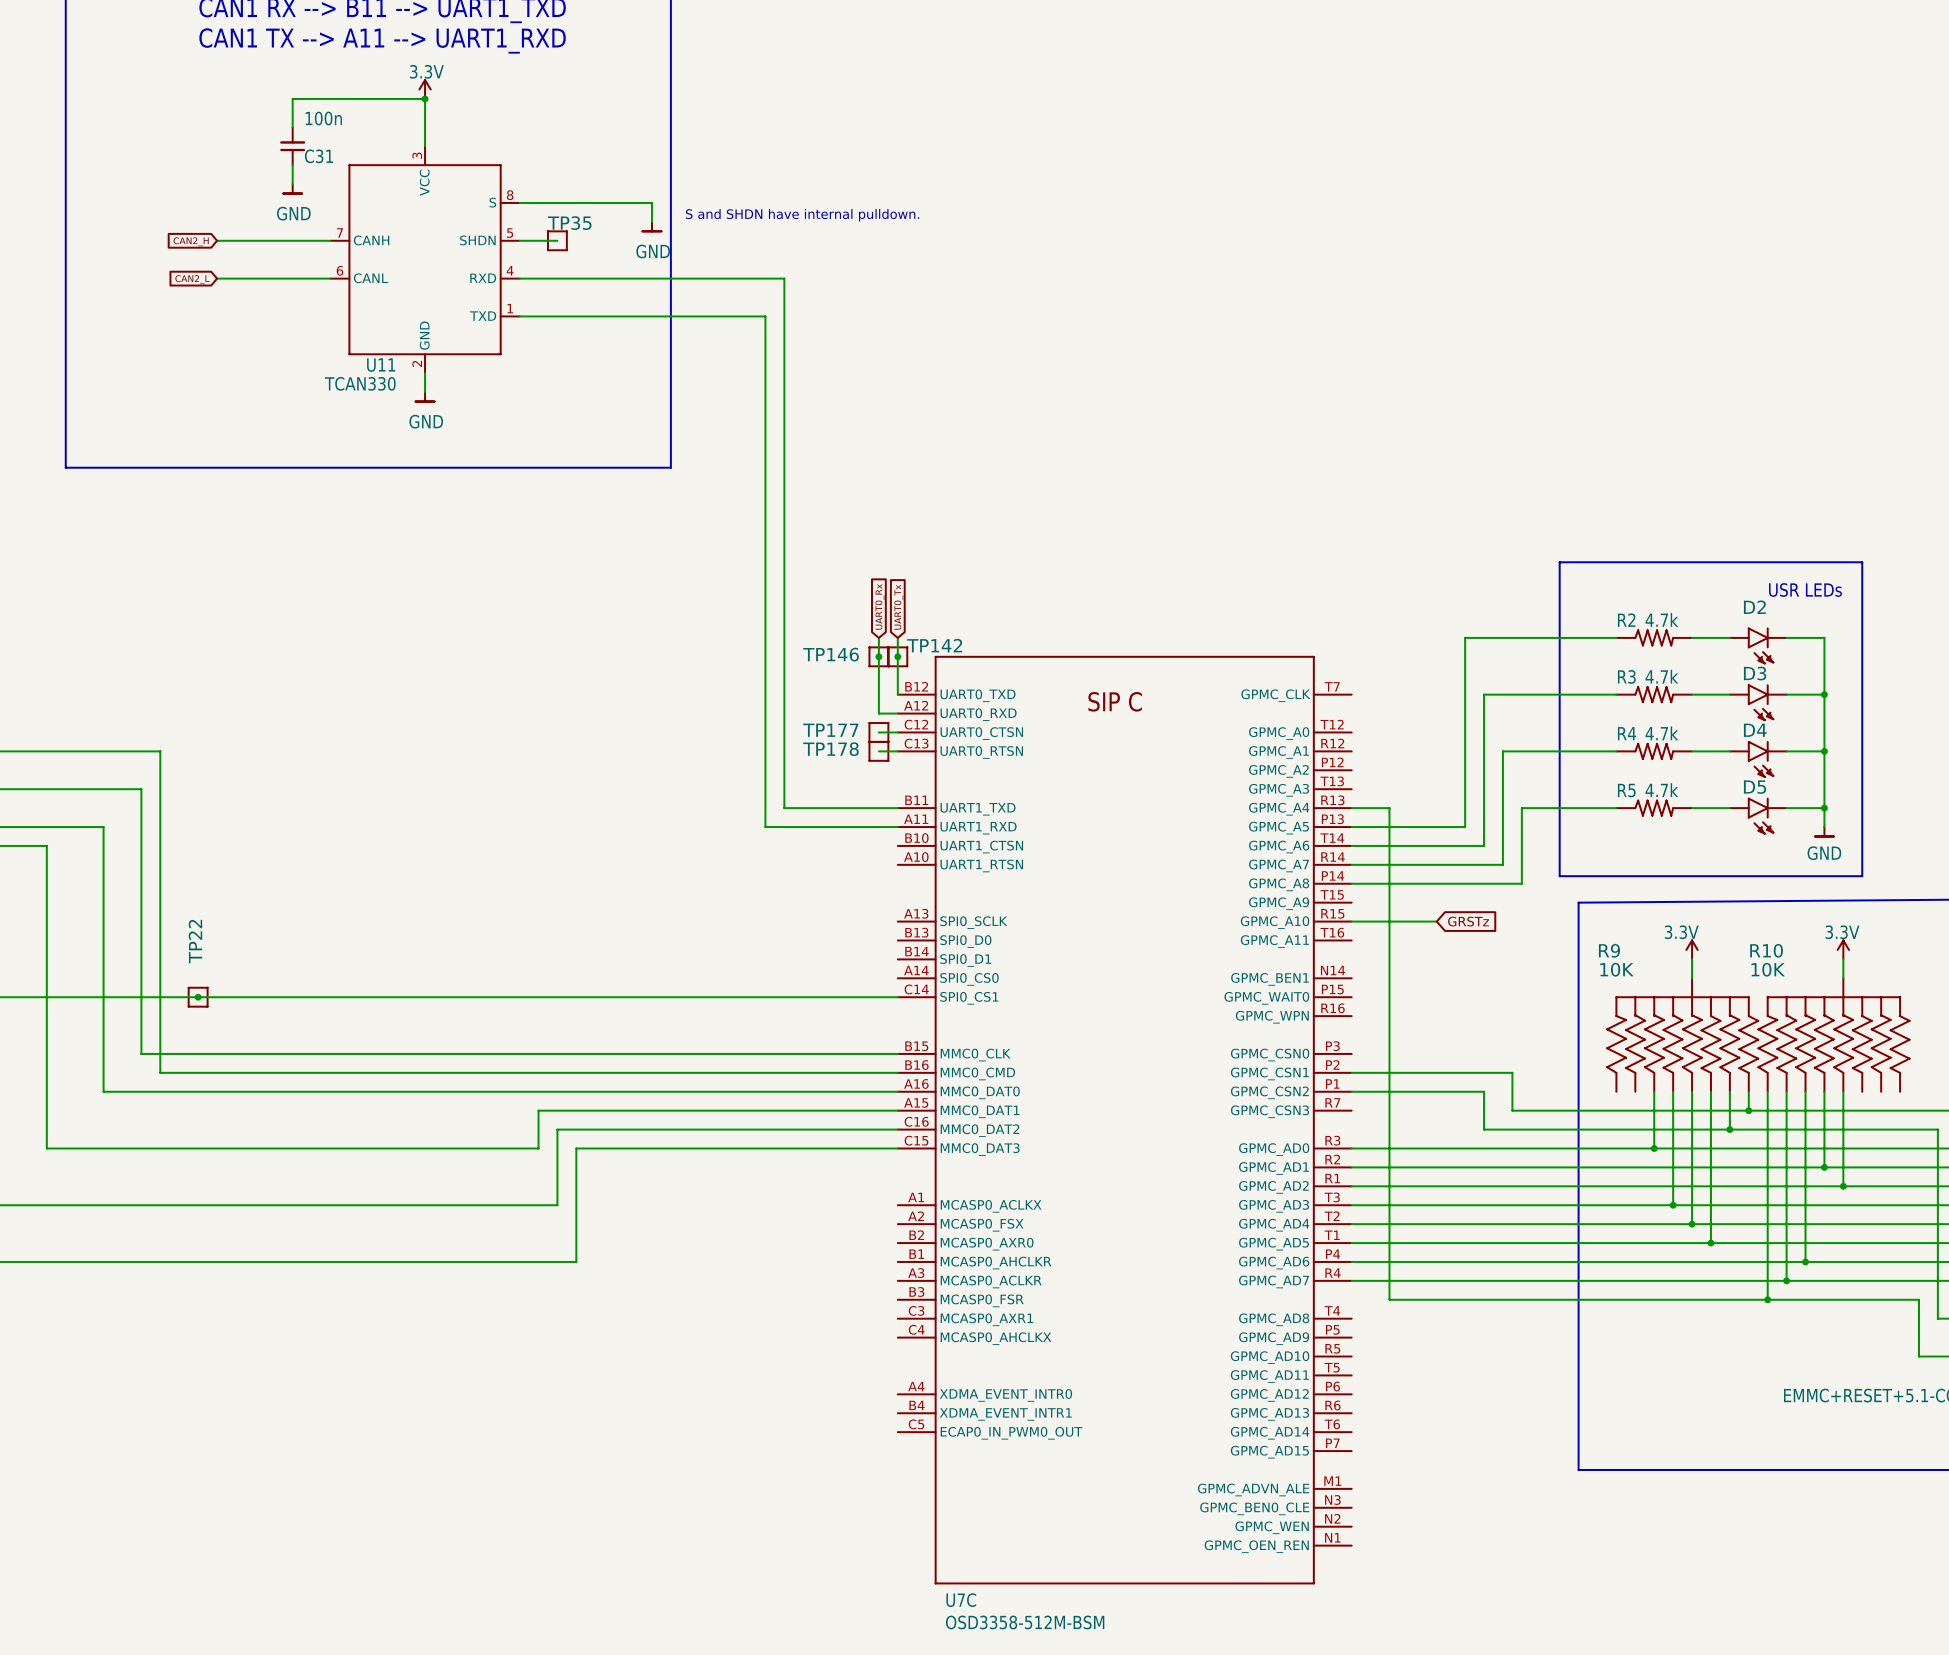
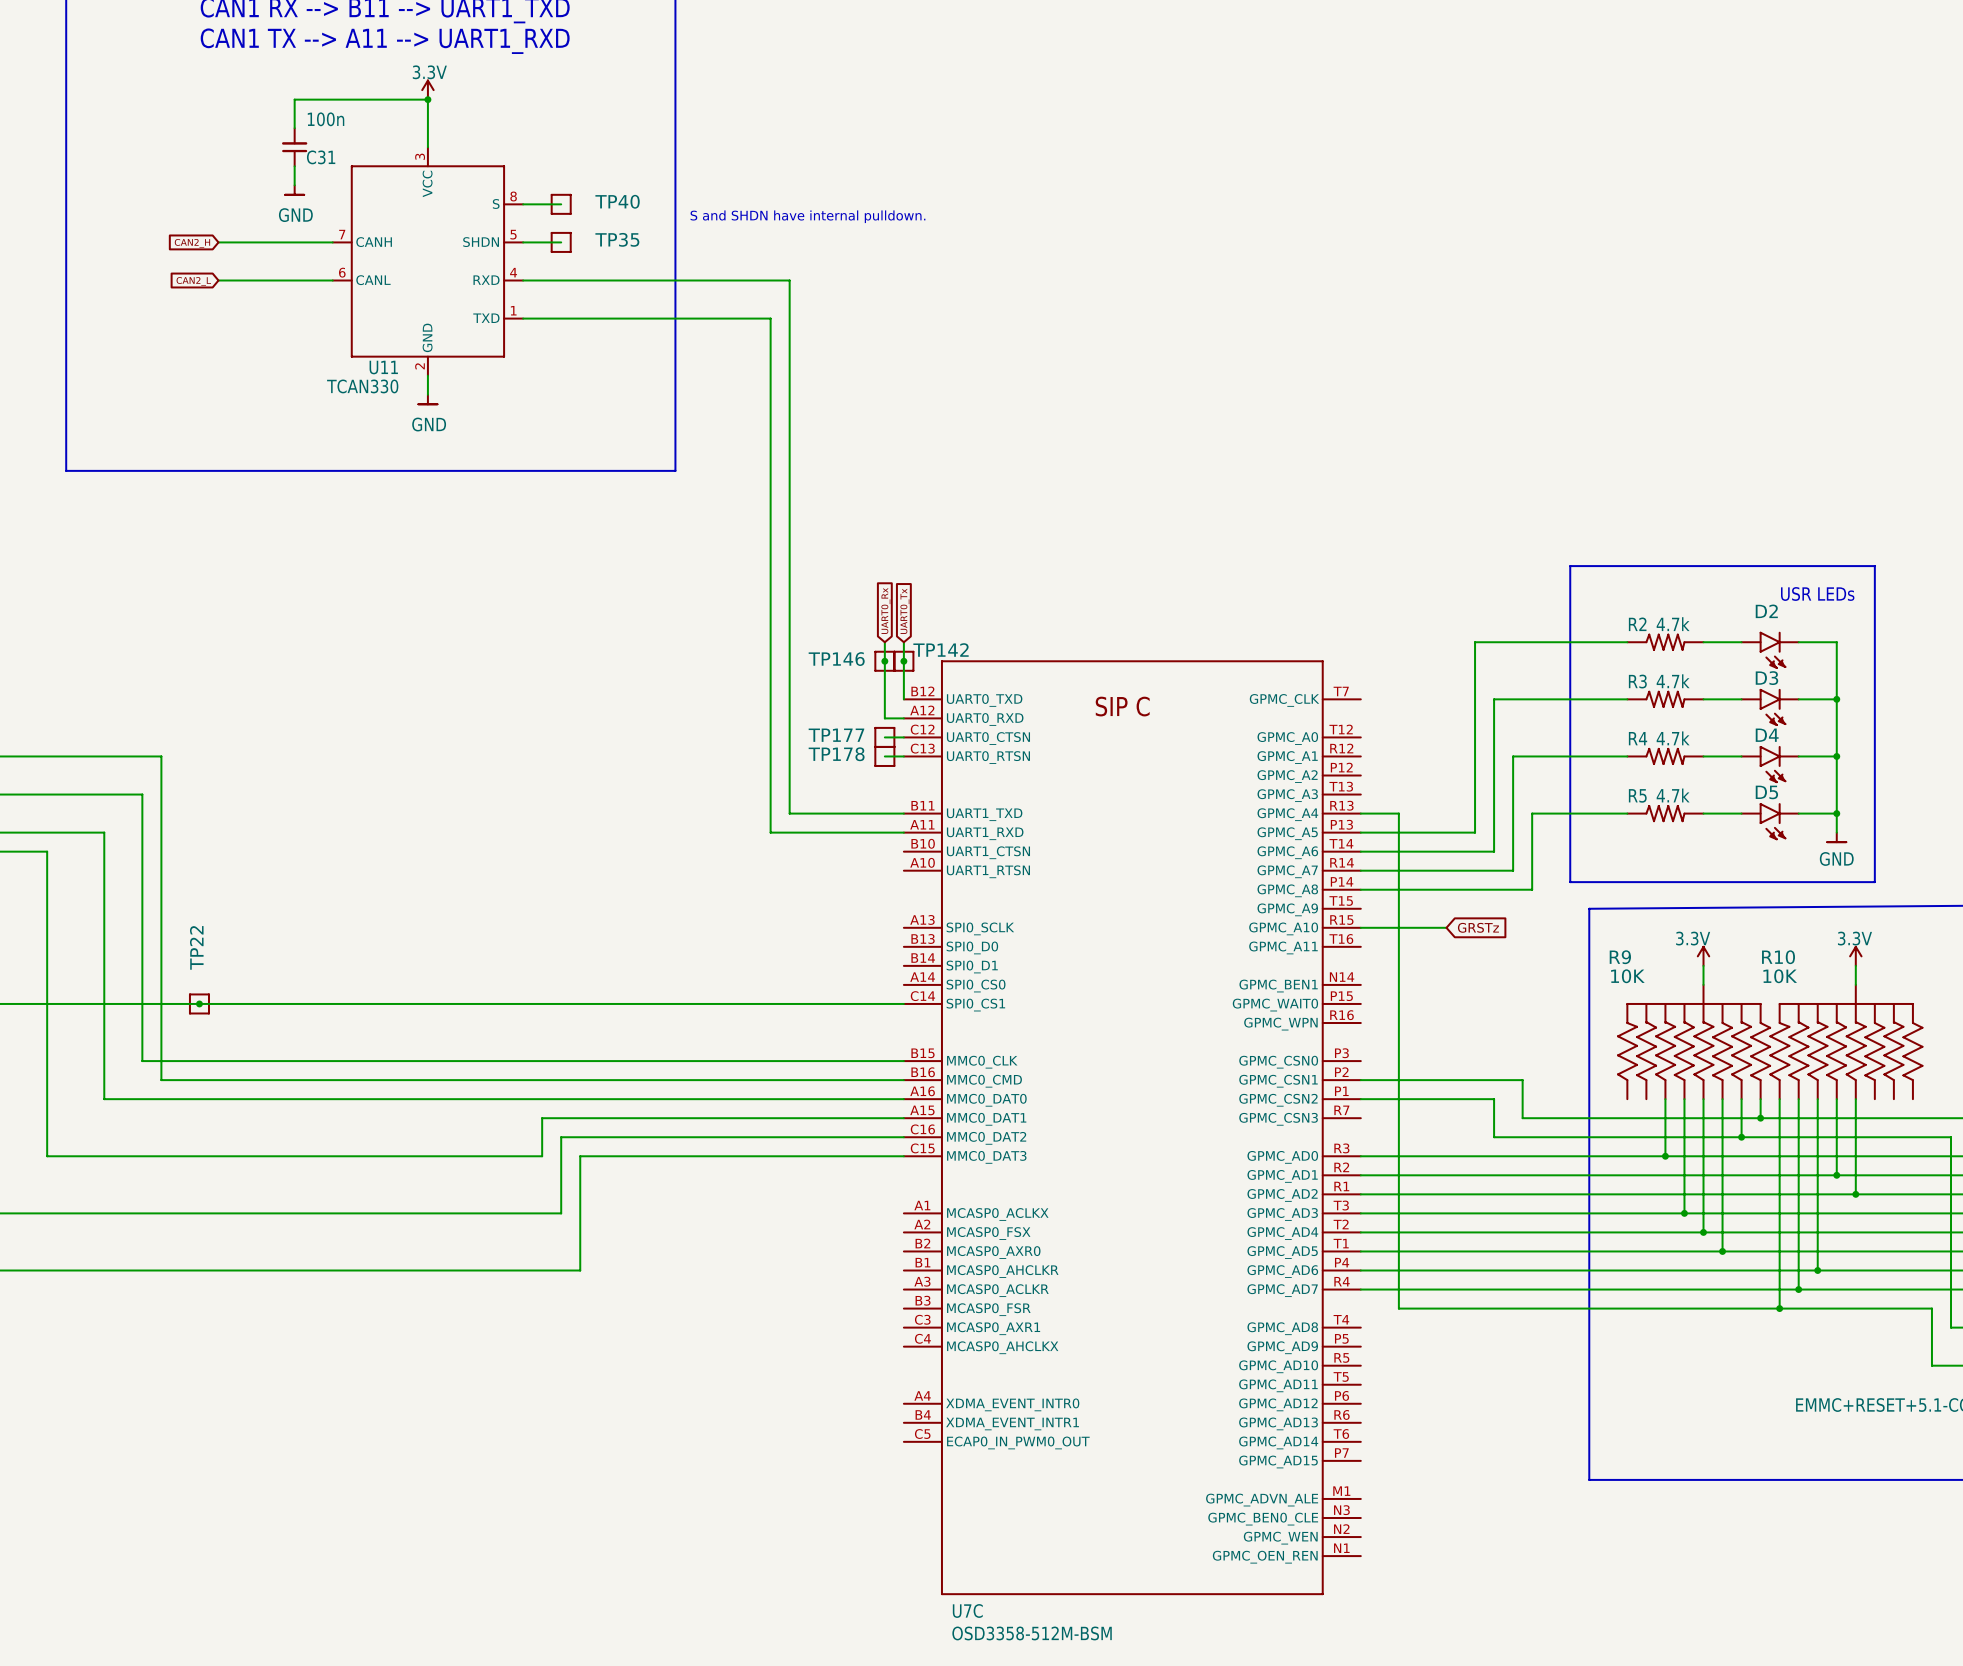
wire: (557, 202) (651, 202) (651, 221) -> none
TP40: none -> (561, 204)
TP35 name position: TP35 (569, 223) -> TP35 (617, 239)
power symbol: GND (651, 226) -> none

